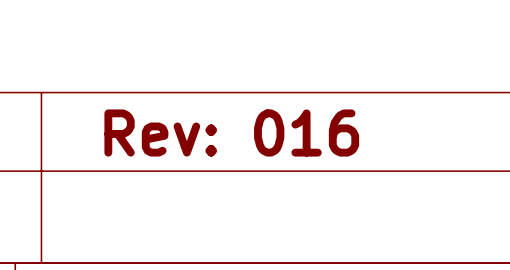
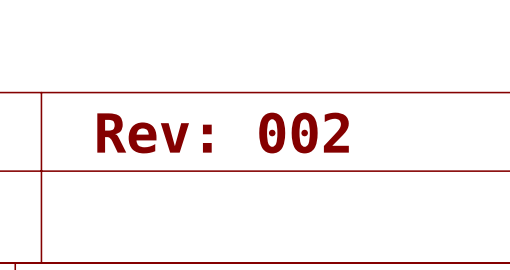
title block: Rev: 016 (231, 133) -> Rev: 002 (223, 133)

